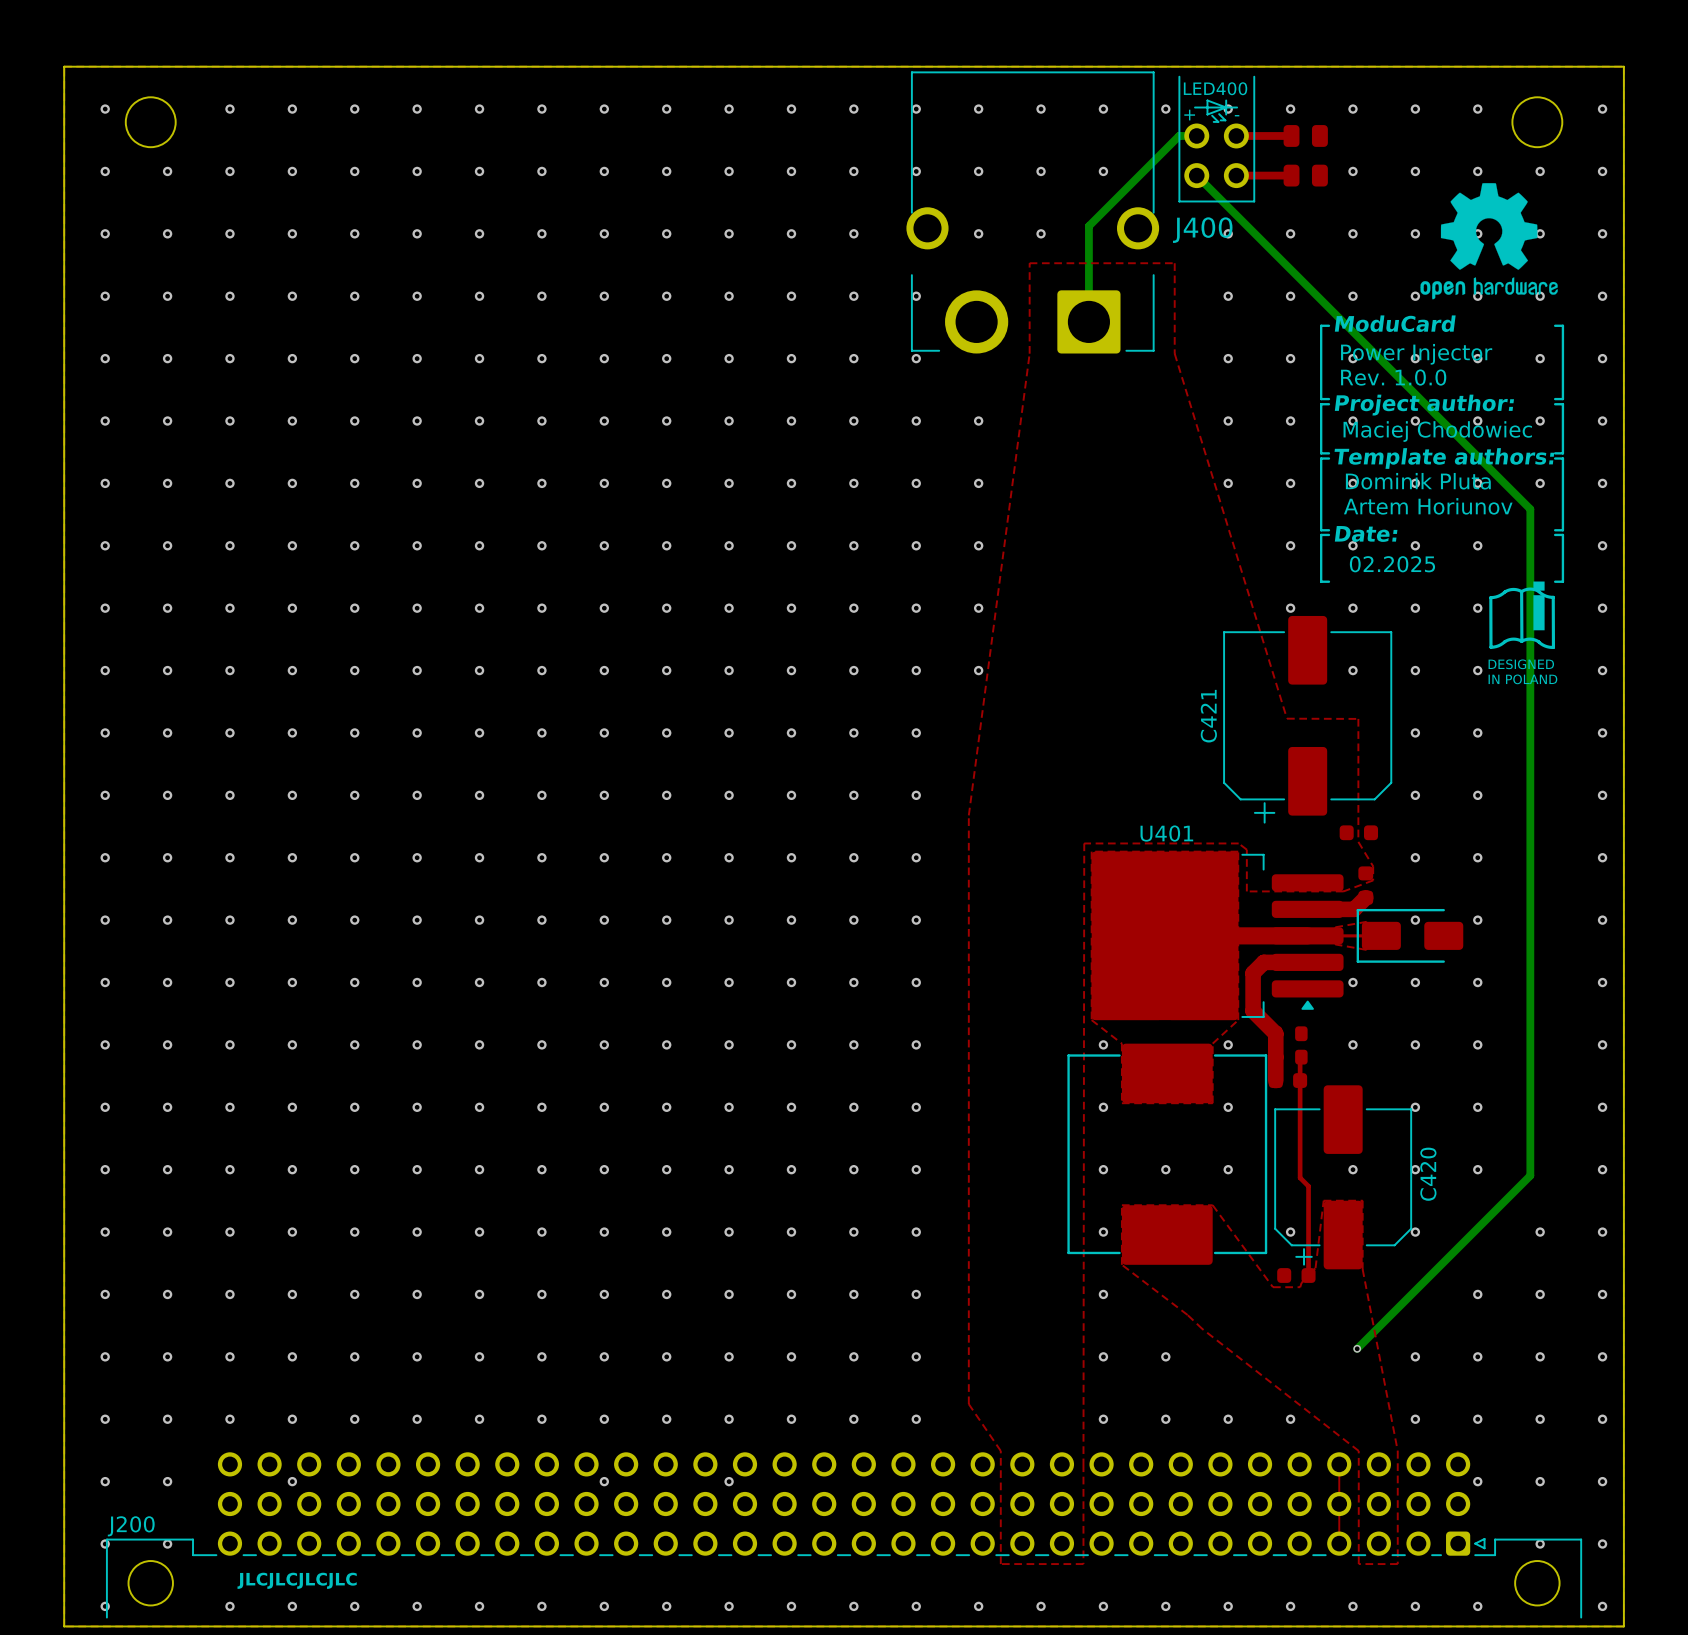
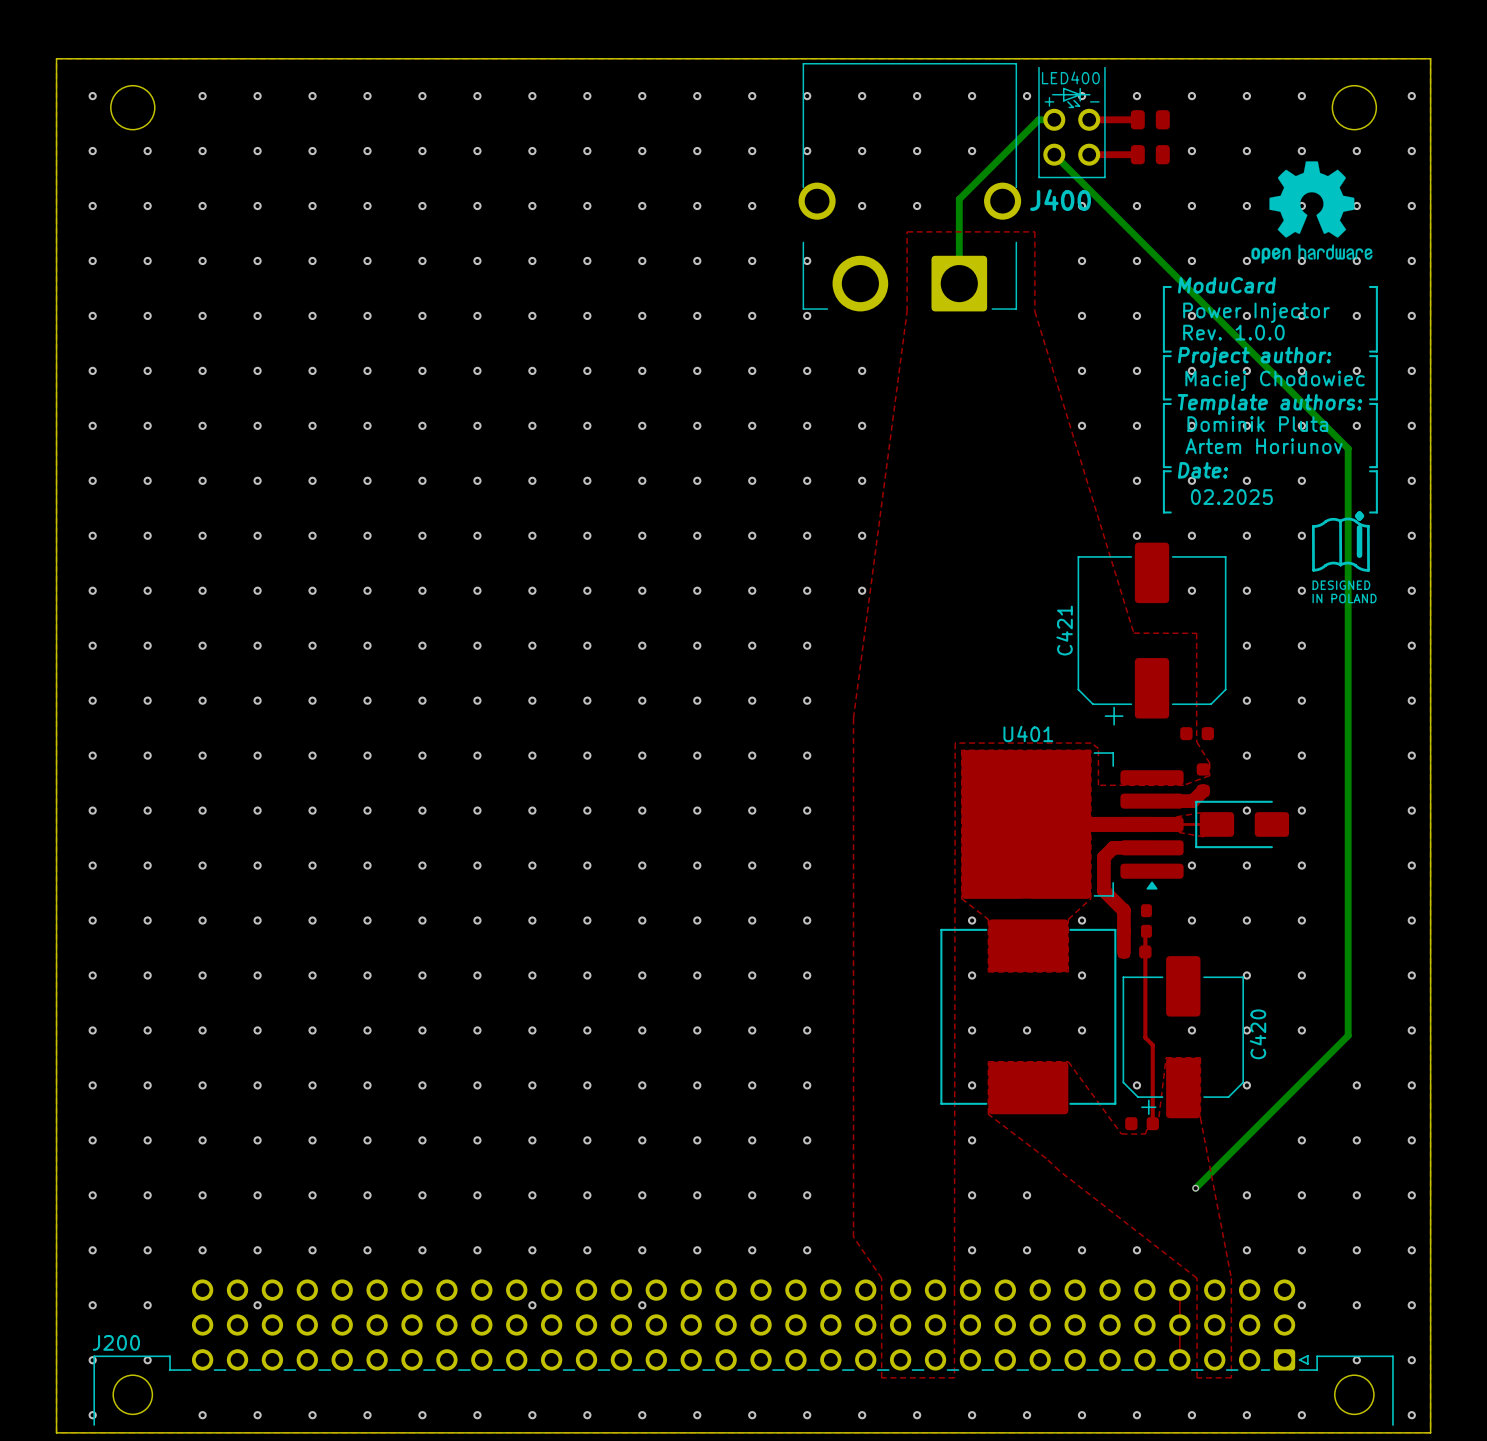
drawing: [237, 1572, 357, 1589] -> none

